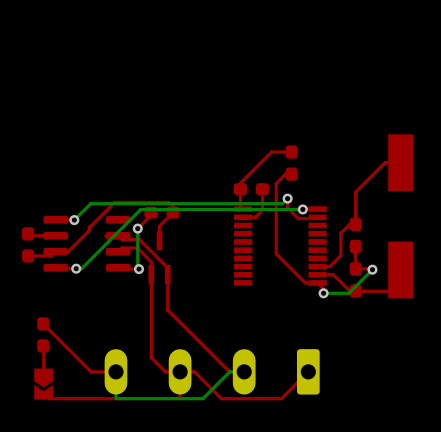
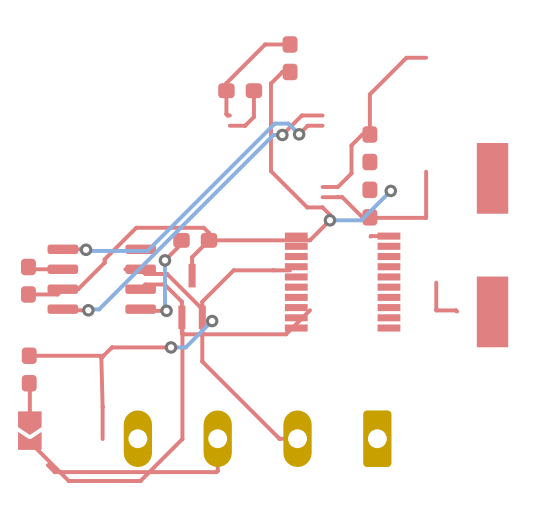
part: none -> (290, 58)
top track: none -> (290, 71) (282, 71) (270, 83) (270, 171) (307, 207) (322, 207) (329, 214) (329, 220) (309, 240) (208, 240)
part: none -> (240, 90)
top track: none -> (322, 115) (301, 115) (282, 134)
top track: none -> (322, 125) (307, 125) (299, 134)
bottom track: none -> (282, 134) (273, 134) (99, 309) (89, 309)
via: none -> (282, 134)
bottom track: none -> (299, 134) (288, 123) (274, 123) (147, 250) (90, 250)
via: none -> (299, 134)
part: none -> (369, 148)
top track: (291, 152) (271, 152) (240, 183) (240, 208) (243, 209) -> (290, 44) (265, 44) (226, 83) (226, 114) (229, 115)
top track: (400, 162) (385, 162) (355, 192) (355, 224) (349, 224) (340, 233) (340, 255) (329, 266) (317, 266) -> (426, 57) (406, 57) (369, 94) (369, 134) (362, 134) (351, 145) (351, 173) (337, 187) (322, 187)
part: (291, 163) -> none
via: none -> (390, 190)
top track: (291, 174) (285, 174) (276, 183) (276, 253) (305, 282) (317, 282) (323, 288) (323, 293) -> none
part: none -> (369, 203)
part: (251, 189) -> none
top track: (262, 189) (262, 210) (255, 217) (243, 217) -> (253, 90) (253, 116) (245, 125) (229, 125)
via: none -> (329, 220)
top track: (287, 198) (287, 207) (298, 218) (307, 218) -> none
bottom track: (287, 198) (282, 203) (90, 203) (74, 220) -> none
via: (287, 198) -> none
bottom track: (302, 209) (140, 209) (81, 268) (76, 268) -> none
via: (302, 209) -> none
part: (355, 235) -> none
top track: none -> (290, 270) (233, 270) (202, 301) (202, 309)
top track: (400, 254) (400, 291) (349, 290) (333, 274) (317, 274) -> (426, 171) (426, 217) (362, 217) (342, 197) (322, 197)
bottom track: (372, 269) (348, 293) (323, 293) -> (390, 190) (361, 220) (329, 220)
via: (372, 269) -> none
top track: none -> (181, 317) (182, 439) (140, 480) (68, 480) (29, 442)
bottom track: none -> (212, 321) (185, 347) (171, 347)
via: none -> (212, 321)
part: (355, 279) -> none
top track: (151, 287) (151, 357) (165, 371) (194, 371) (221, 398) (281, 398) (308, 371) -> (181, 333) (285, 334) (310, 310)
via: (323, 293) -> none
top track: none -> (171, 347) (111, 347) (101, 357)
via: none -> (171, 347)
top track: none -> (102, 355) (29, 355)
top track: none -> (101, 357) (102, 439)
top track: (43, 323) (91, 371) (115, 371) -> none
part position: (43, 334) -> (29, 369)
top track: (43, 345) (43, 374) -> (29, 383) (29, 419)
bottom track: (244, 371) (229, 371) (202, 398) (116, 398) (115, 371) -> none
part position: (43, 383) -> (29, 430)

